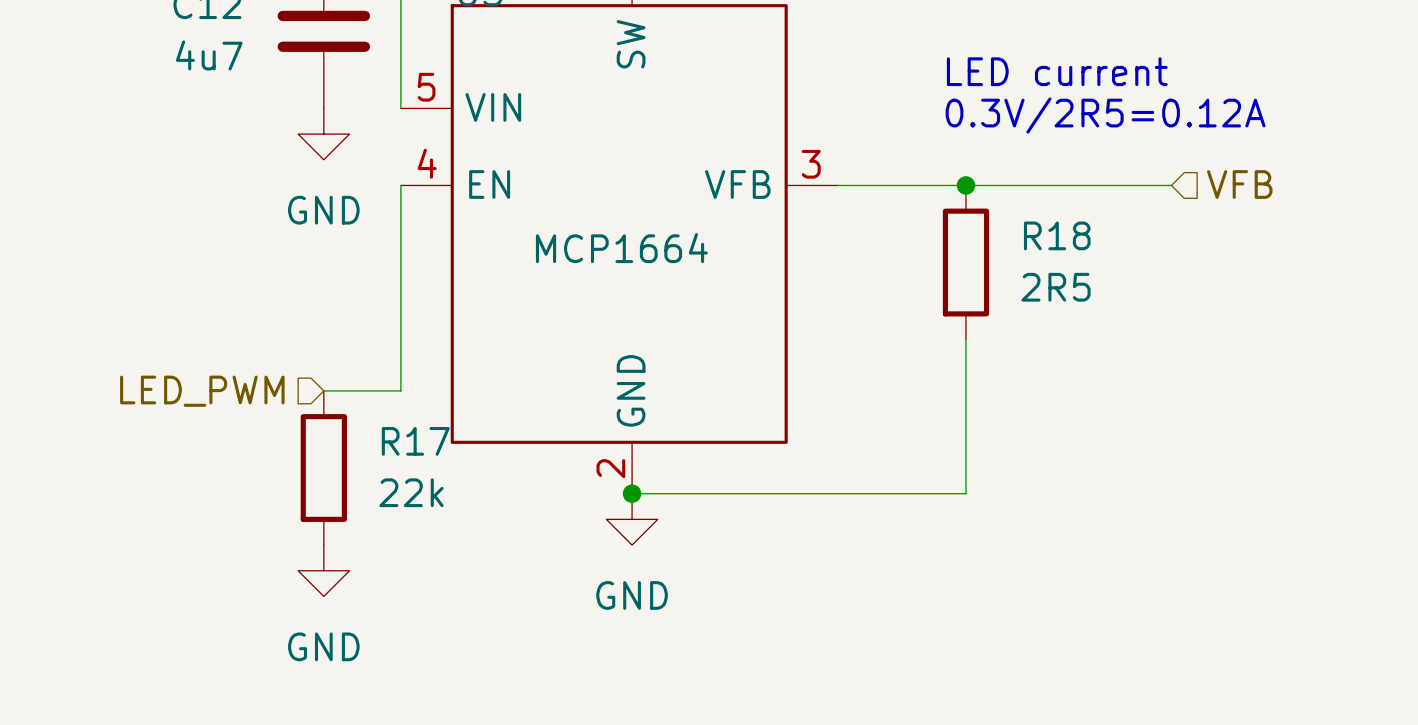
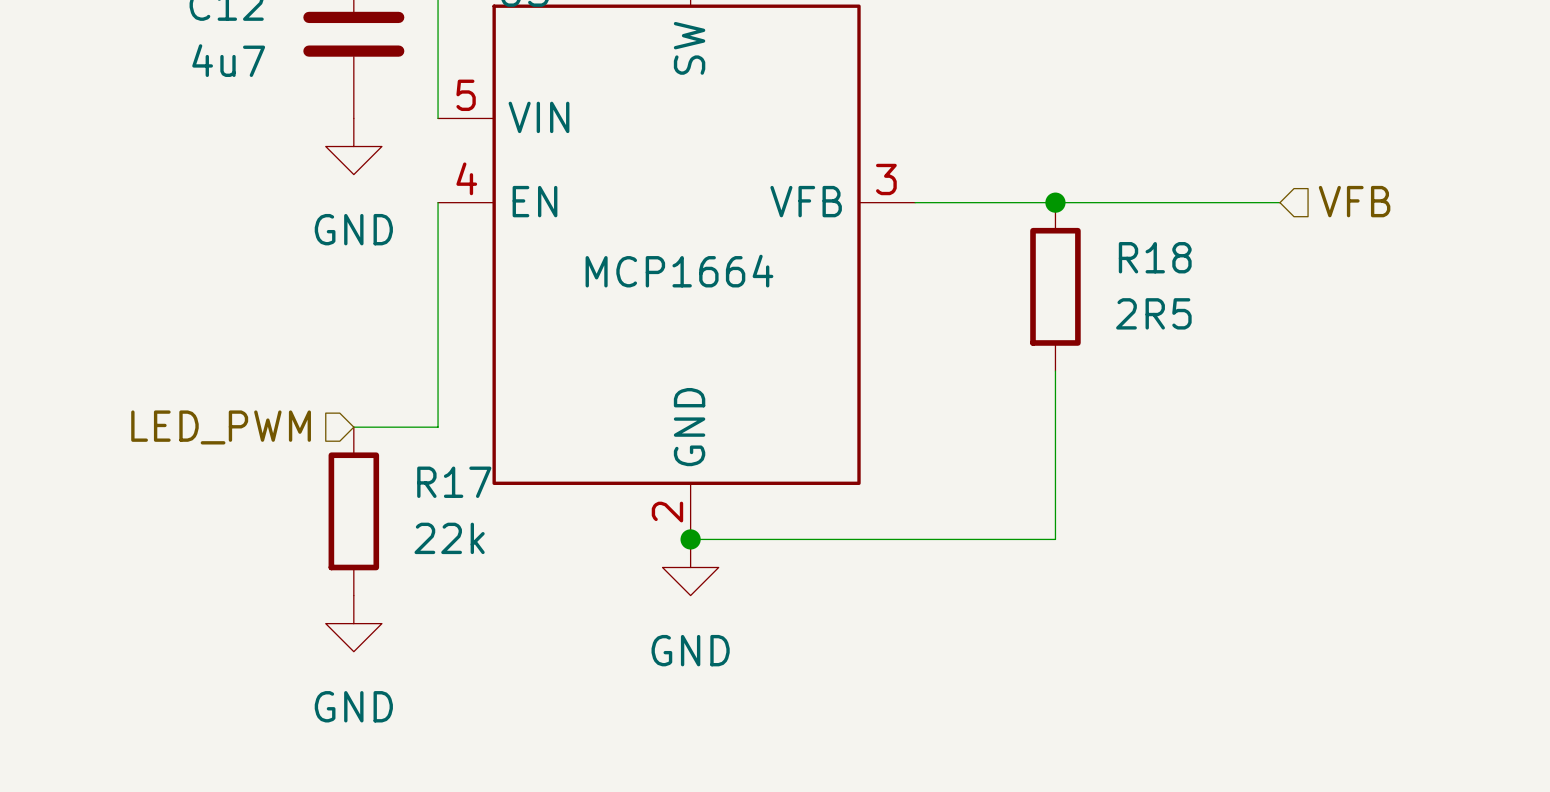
text: LED current (1057, 71) -> none
text: 0.3V/2R5=0.12A (1105, 115) -> none

